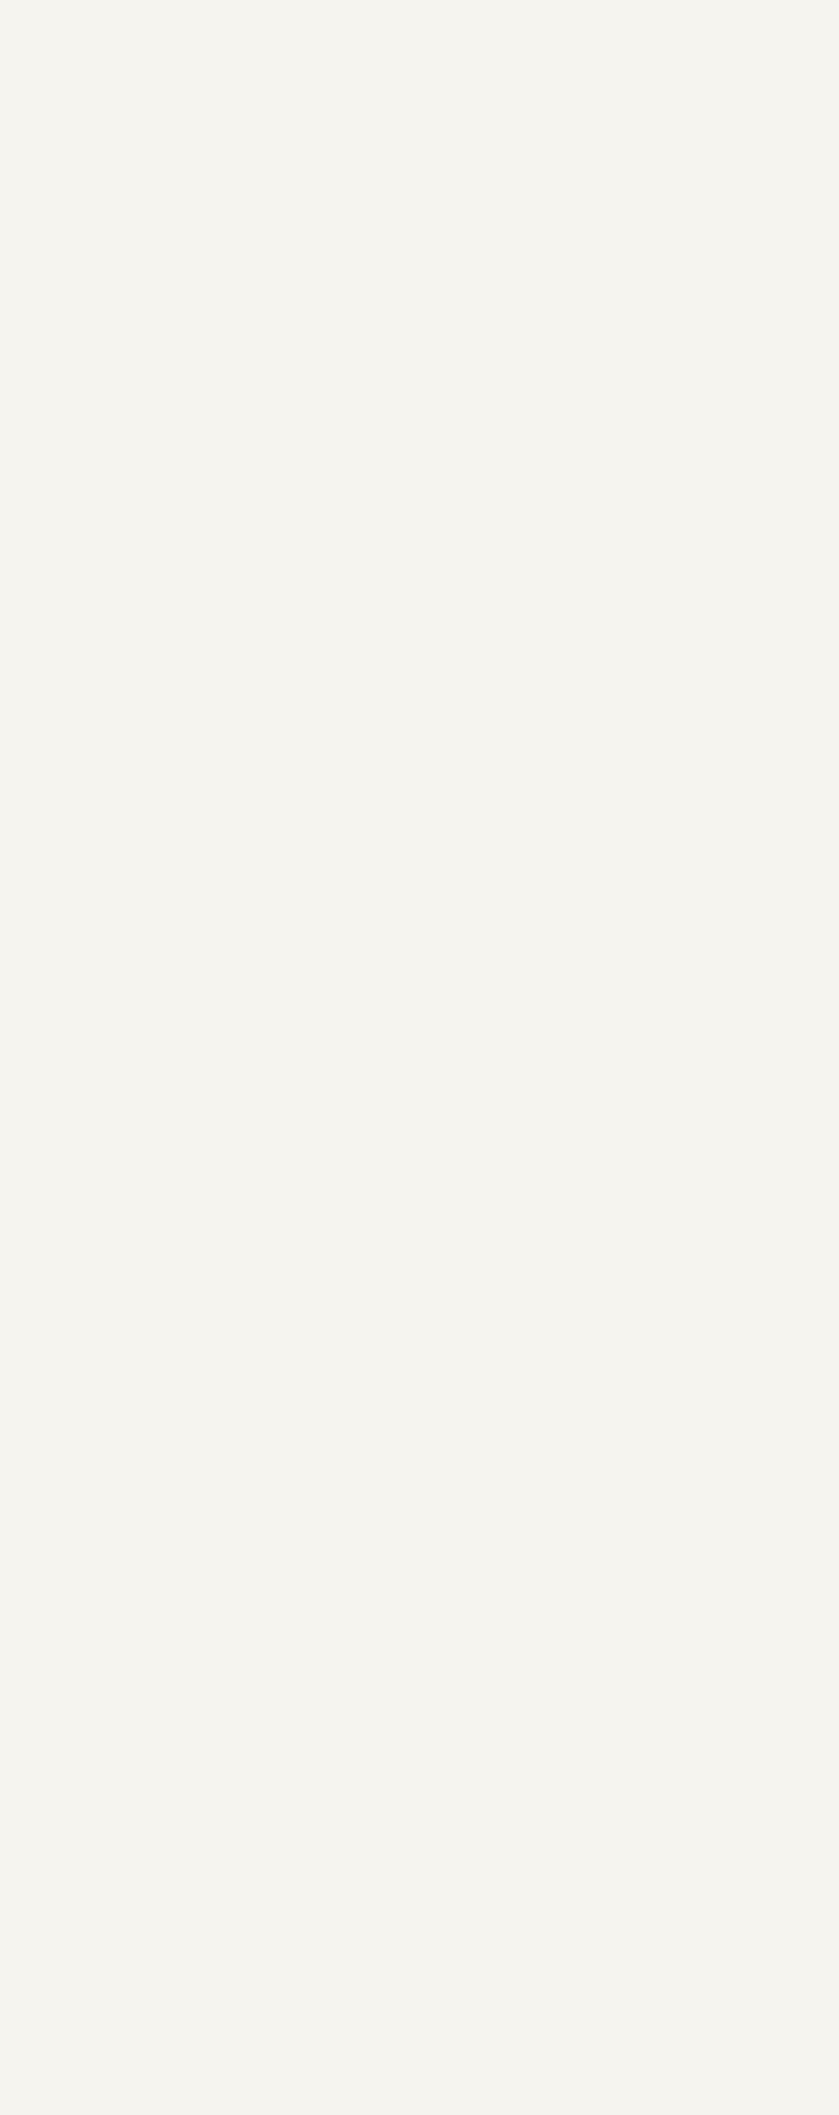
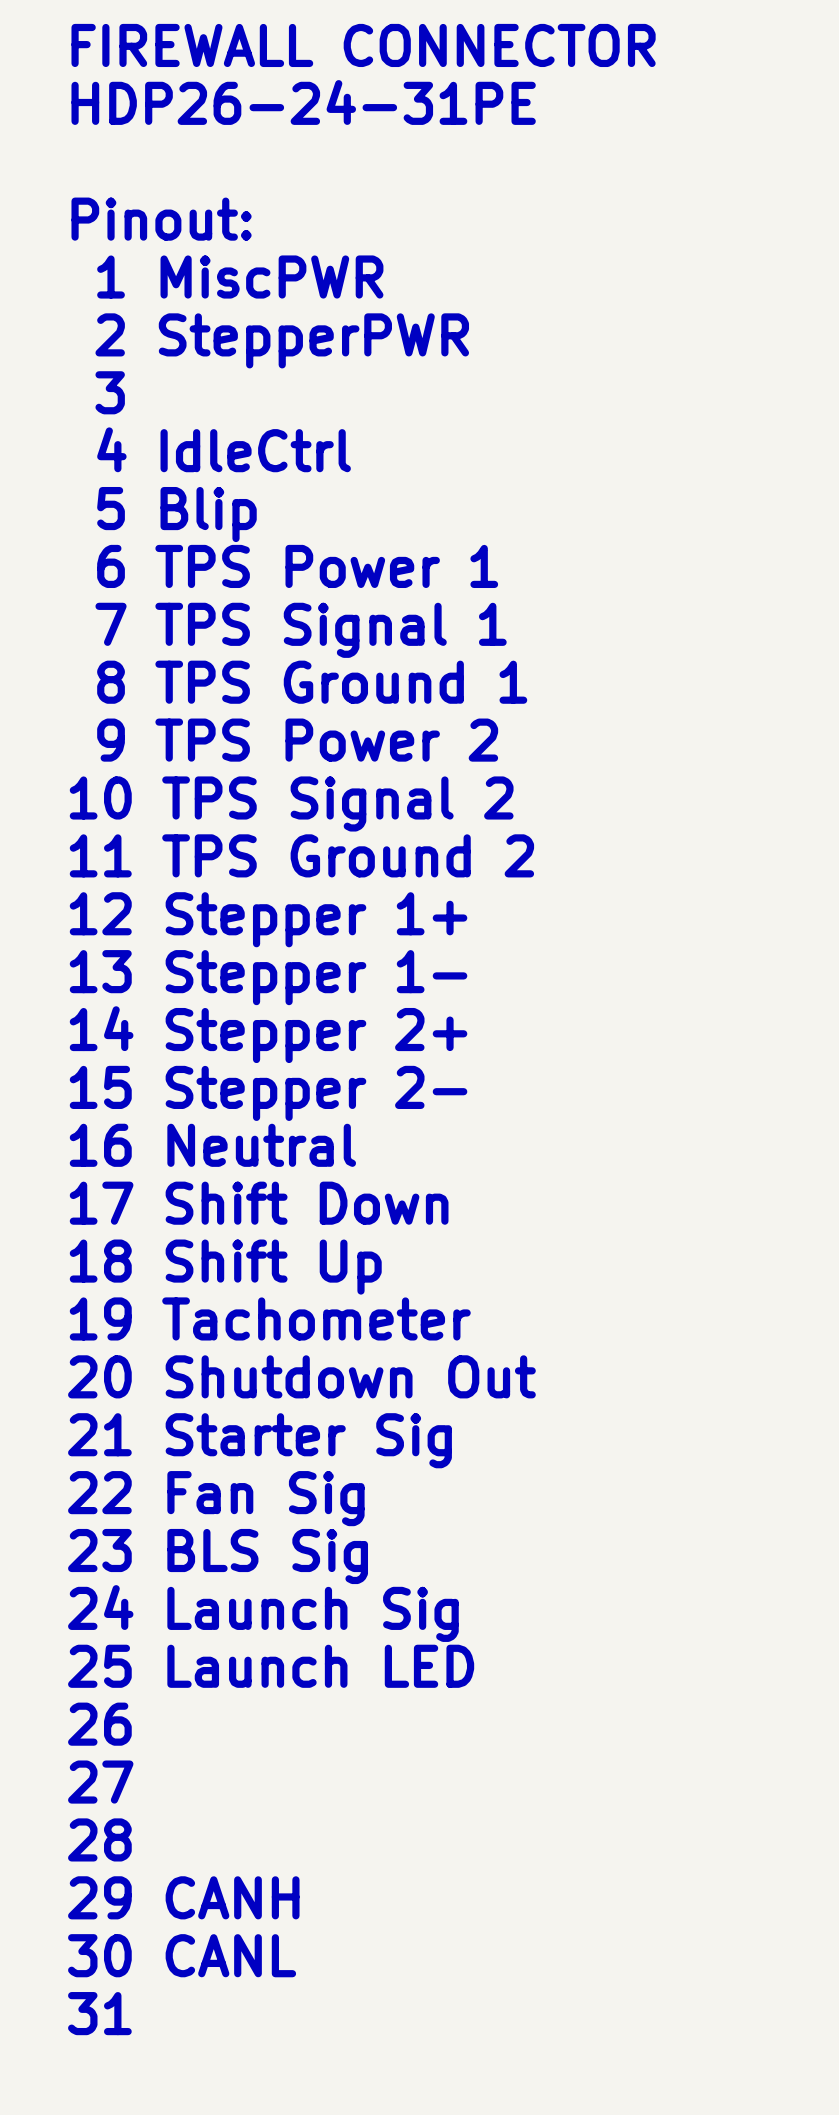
text: none -> FIREWALL CONNECTOR (363, 45)
text: none -> HDP26-24-31PE (303, 102)
text: none -> Pinout: (161, 219)
text: none -> 1 MiscPWR (240, 277)
text: none -> 2 StepperPWR (282, 340)
text: none -> 3 (110, 392)
text: none -> 4 IdleCtrl (224, 449)
text: none -> 5 Blip (176, 514)
text: none -> 6 TPS Power 1 (297, 566)
text: none -> 7 TPS Signal 1 (301, 630)
text: none -> 8 TPS Ground 1 (312, 682)
text: none -> 9 TPS Power 2 (297, 740)
text: none -> 10 TPS Signal 2 (291, 803)
text: none -> 11 TPS Ground 2 (301, 855)
text: none -> 12 Stepper 1+ (268, 919)
text: none -> 13 Stepper 1- (268, 977)
text: none -> 14 Stepper 2+ (268, 1034)
text: none -> 15 Stepper 2- (268, 1093)
text: none -> 16 Neutral (212, 1145)
text: none -> 17 Shift Down (259, 1203)
text: none -> 18 Shift Up (225, 1267)
text: none -> 19 Tachometer (270, 1318)
text: none -> 20 Shutdown Out (301, 1376)
text: none -> 21 Starter Sig (259, 1440)
text: none -> 22 Fan Sig (216, 1498)
text: none -> 23 BLS Sig (218, 1556)
text: none -> 24 Launch Sig (263, 1613)
text: none -> 25 Launch LED (271, 1666)
text: none -> 26 (99, 1724)
text: none -> 27 (100, 1782)
text: none -> 28 (99, 1839)
text: none -> 29 CANH (183, 1897)
text: none -> 30 CANL (182, 1955)
text: none -> 31 (99, 2013)

